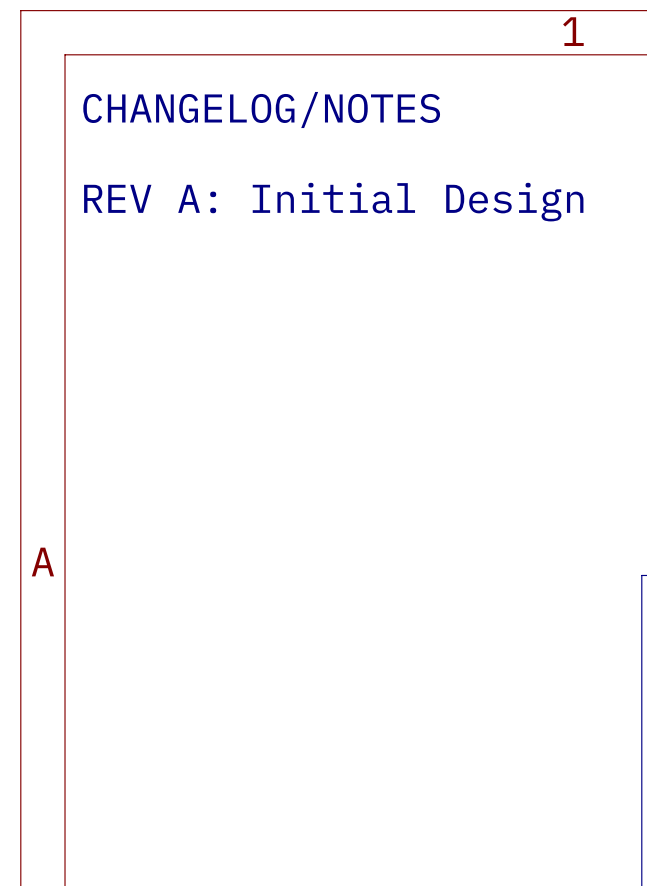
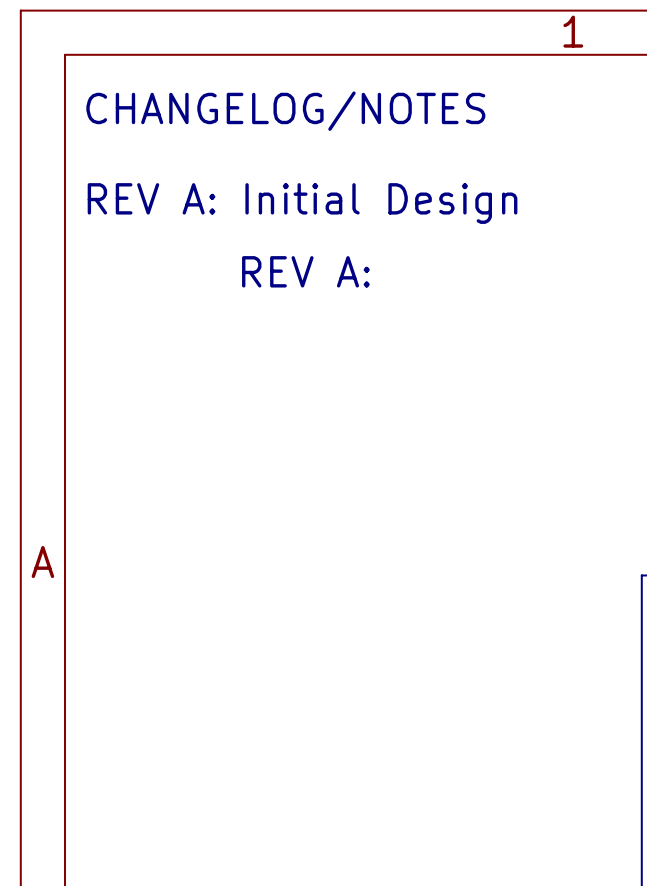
text: none -> REV A: (305, 271)

